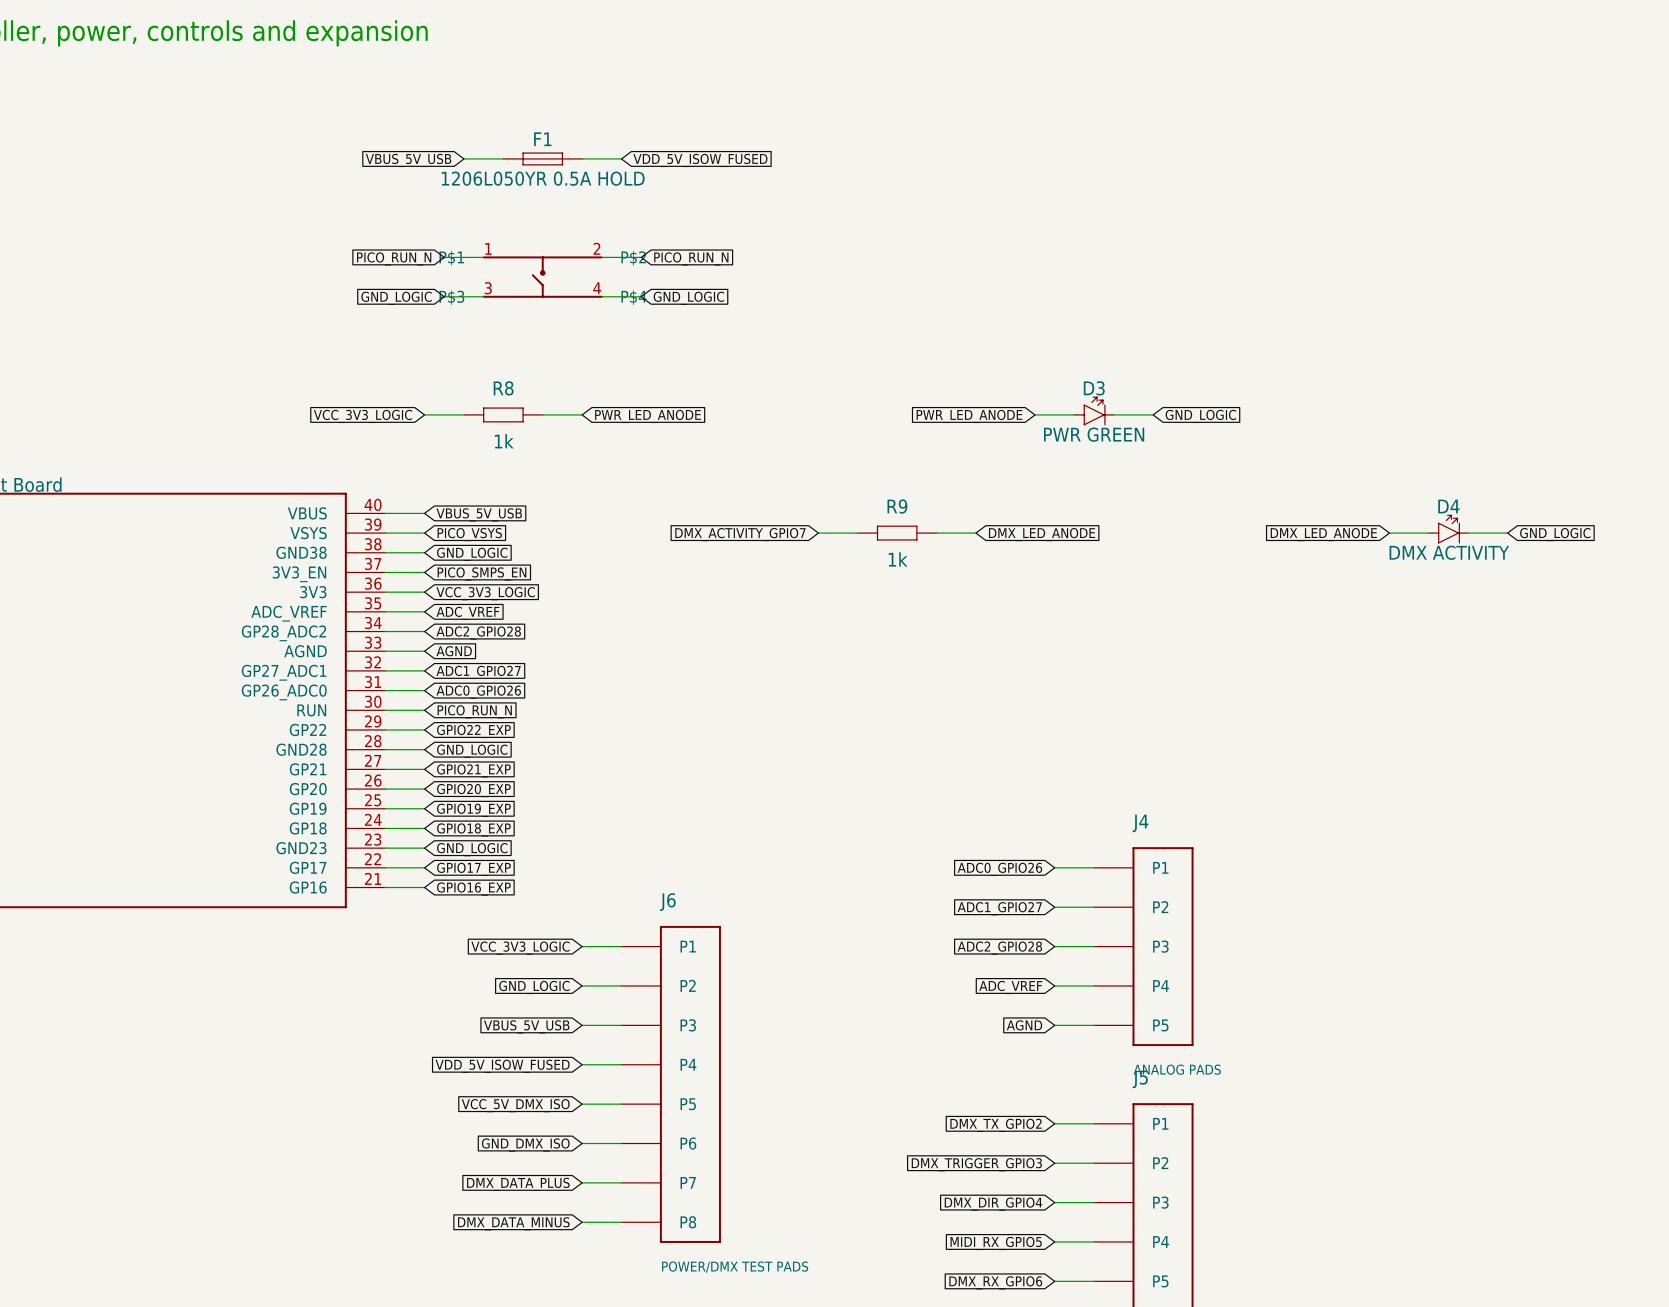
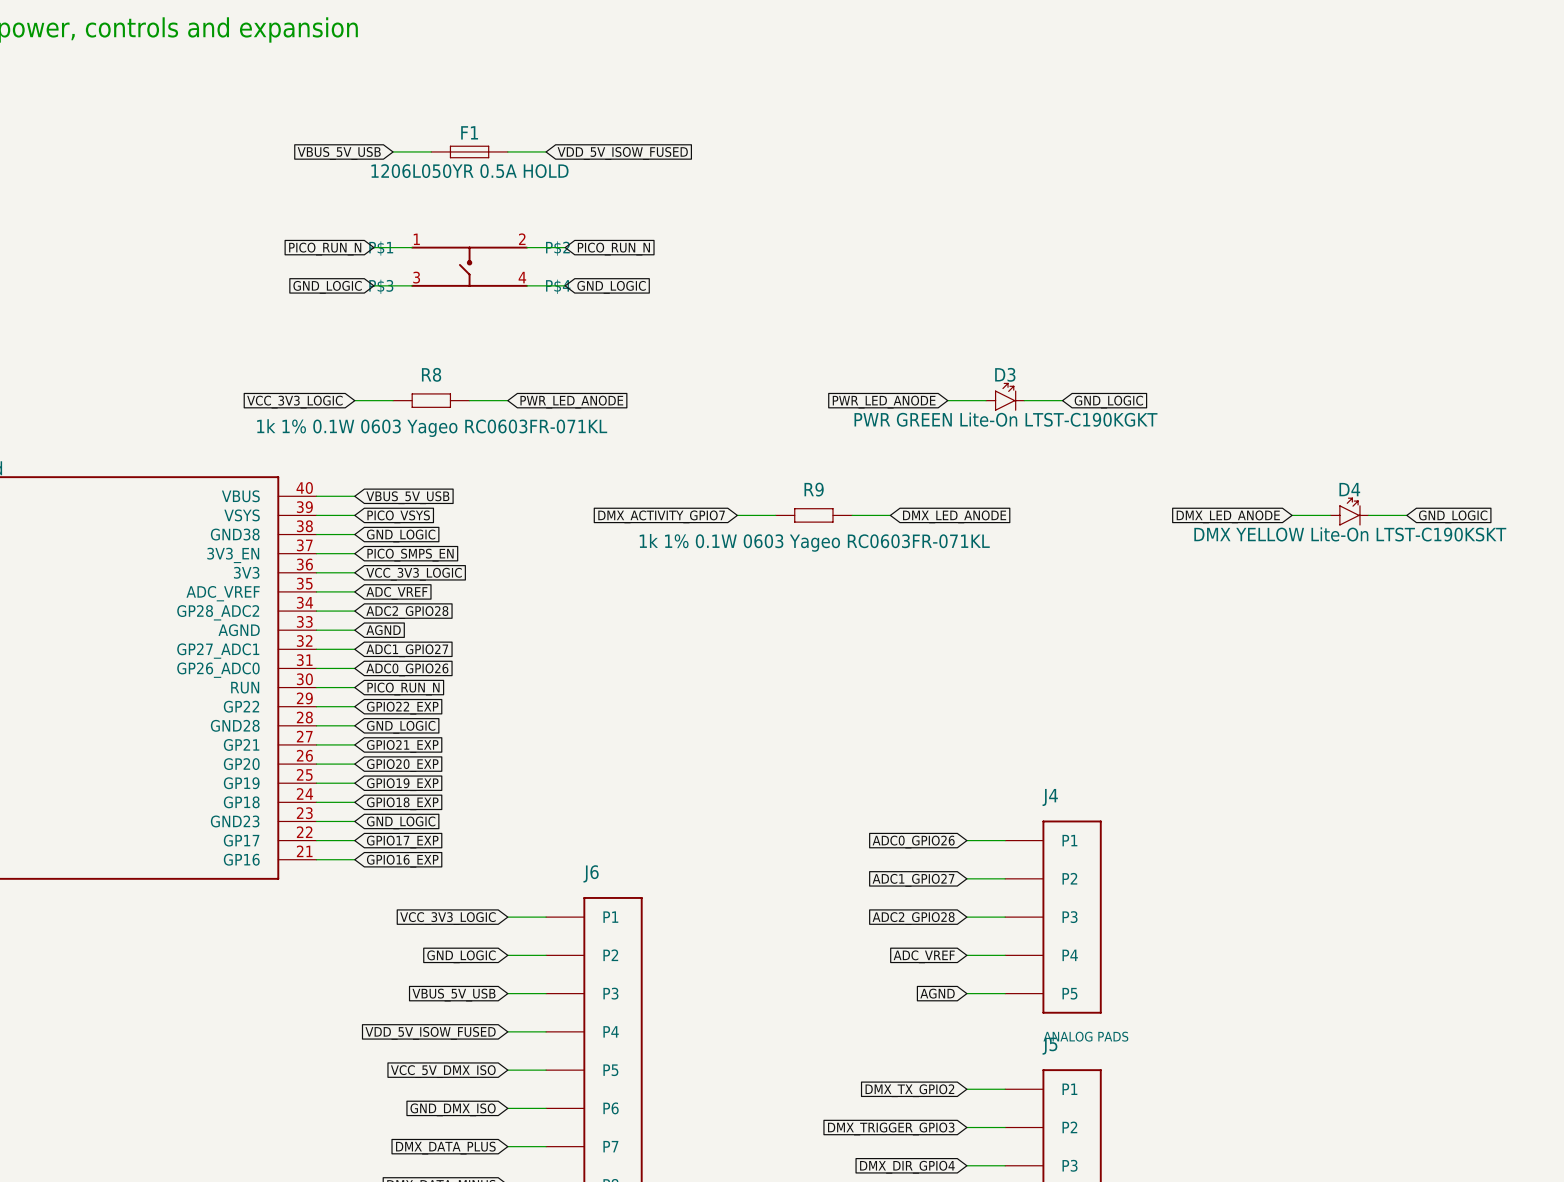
D3 value: PWR GREEN (1094, 434) -> PWR GREEN Lite-On LTST-C190KGKT (1005, 419)
R8 value: 1k (504, 441) -> 1k 1% 0.1W 0603 Yageo RC0603FR-071KL (432, 428)
D4 value: DMX ACTIVITY (1449, 552) -> DMX YELLOW Lite-On LTST-C190KSKT (1350, 534)
R9 value: 1k (898, 559) -> 1k 1% 0.1W 0603 Yageo RC0603FR-071KL (814, 542)

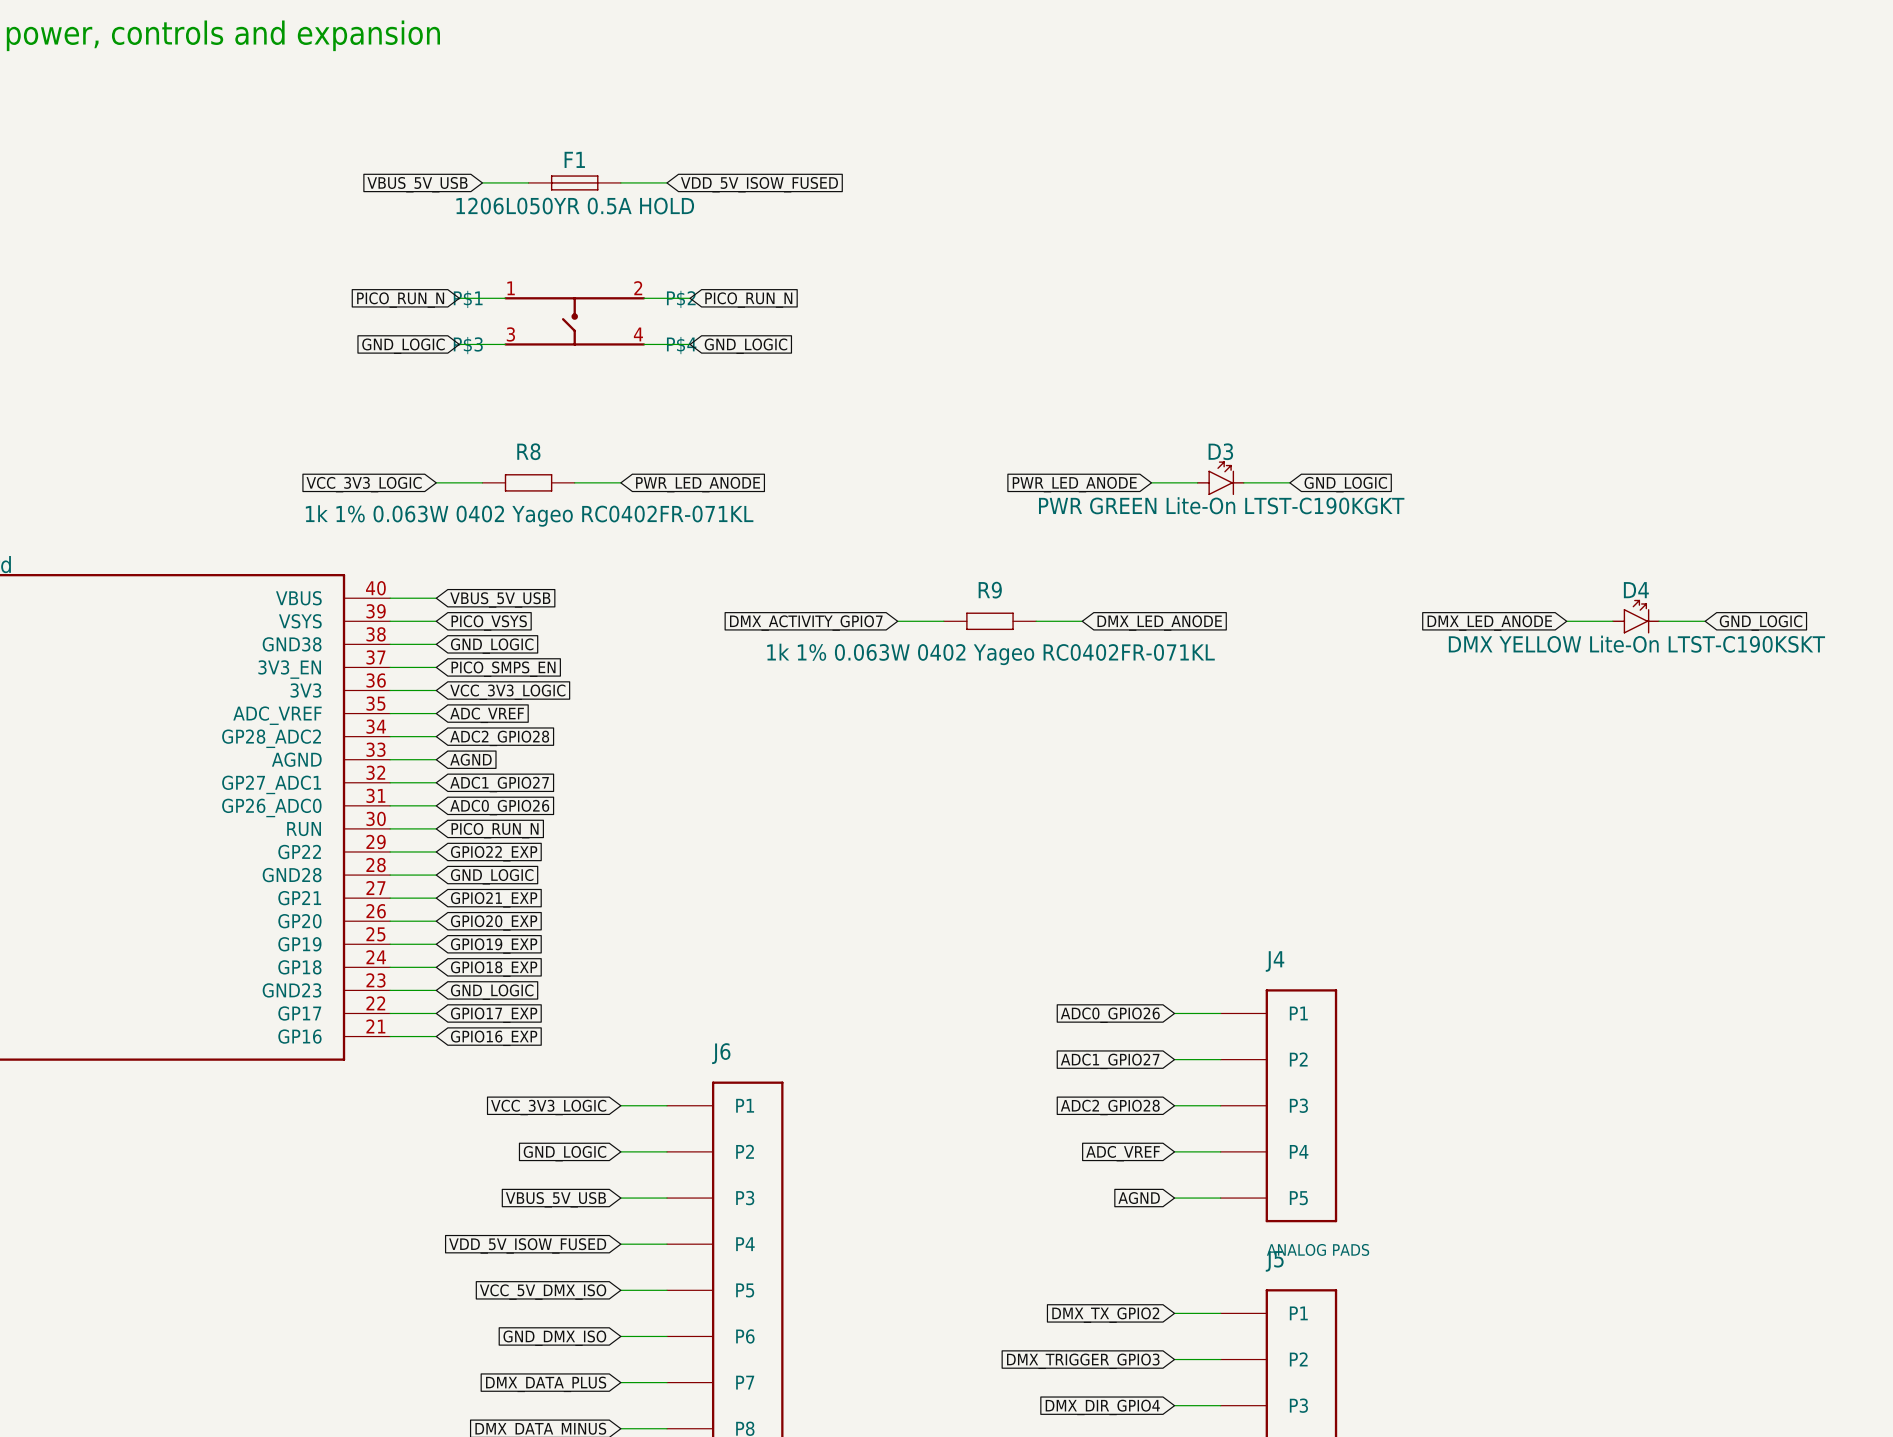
R8 value: 1k 1% 0.1W 0603 Yageo RC0603FR-071KL (432, 428) -> 1k 1% 0.063W 0402 Yageo RC0402FR-071KL (529, 515)
R9 value: 1k 1% 0.1W 0603 Yageo RC0603FR-071KL (814, 542) -> 1k 1% 0.063W 0402 Yageo RC0402FR-071KL (991, 654)

